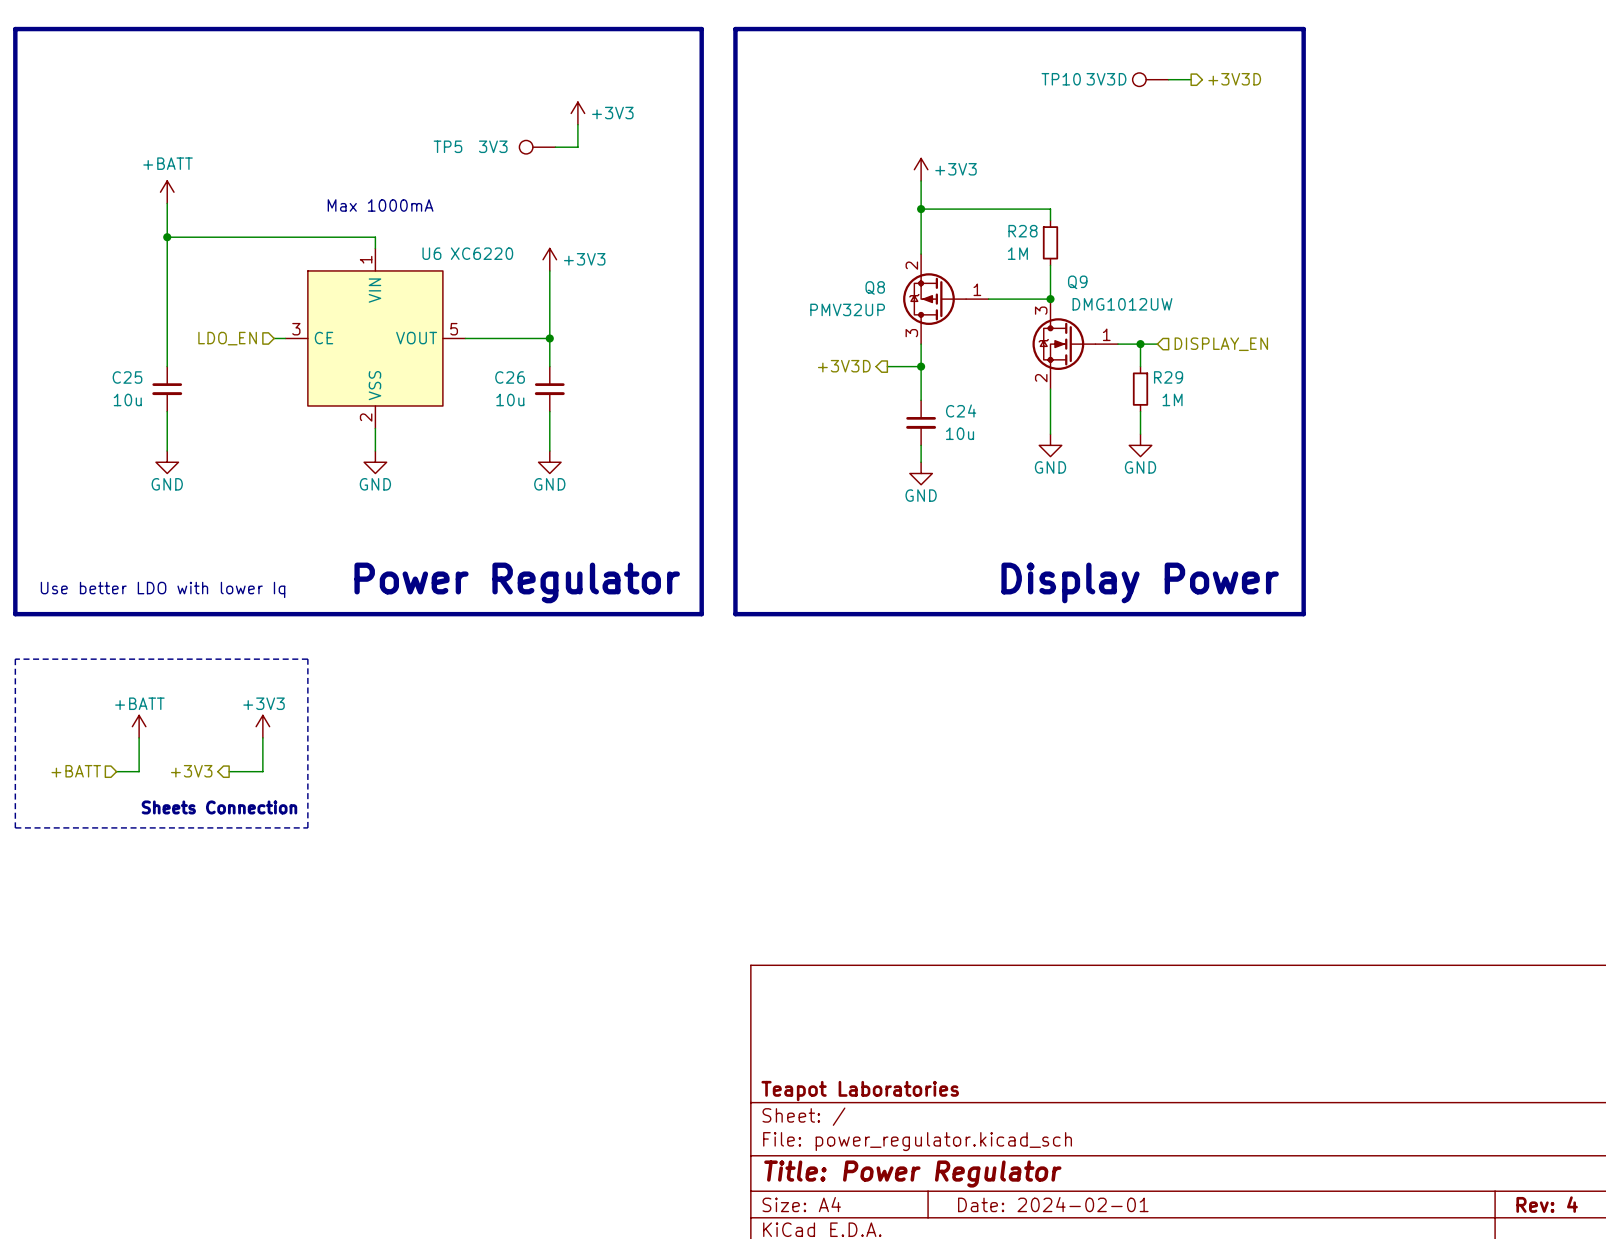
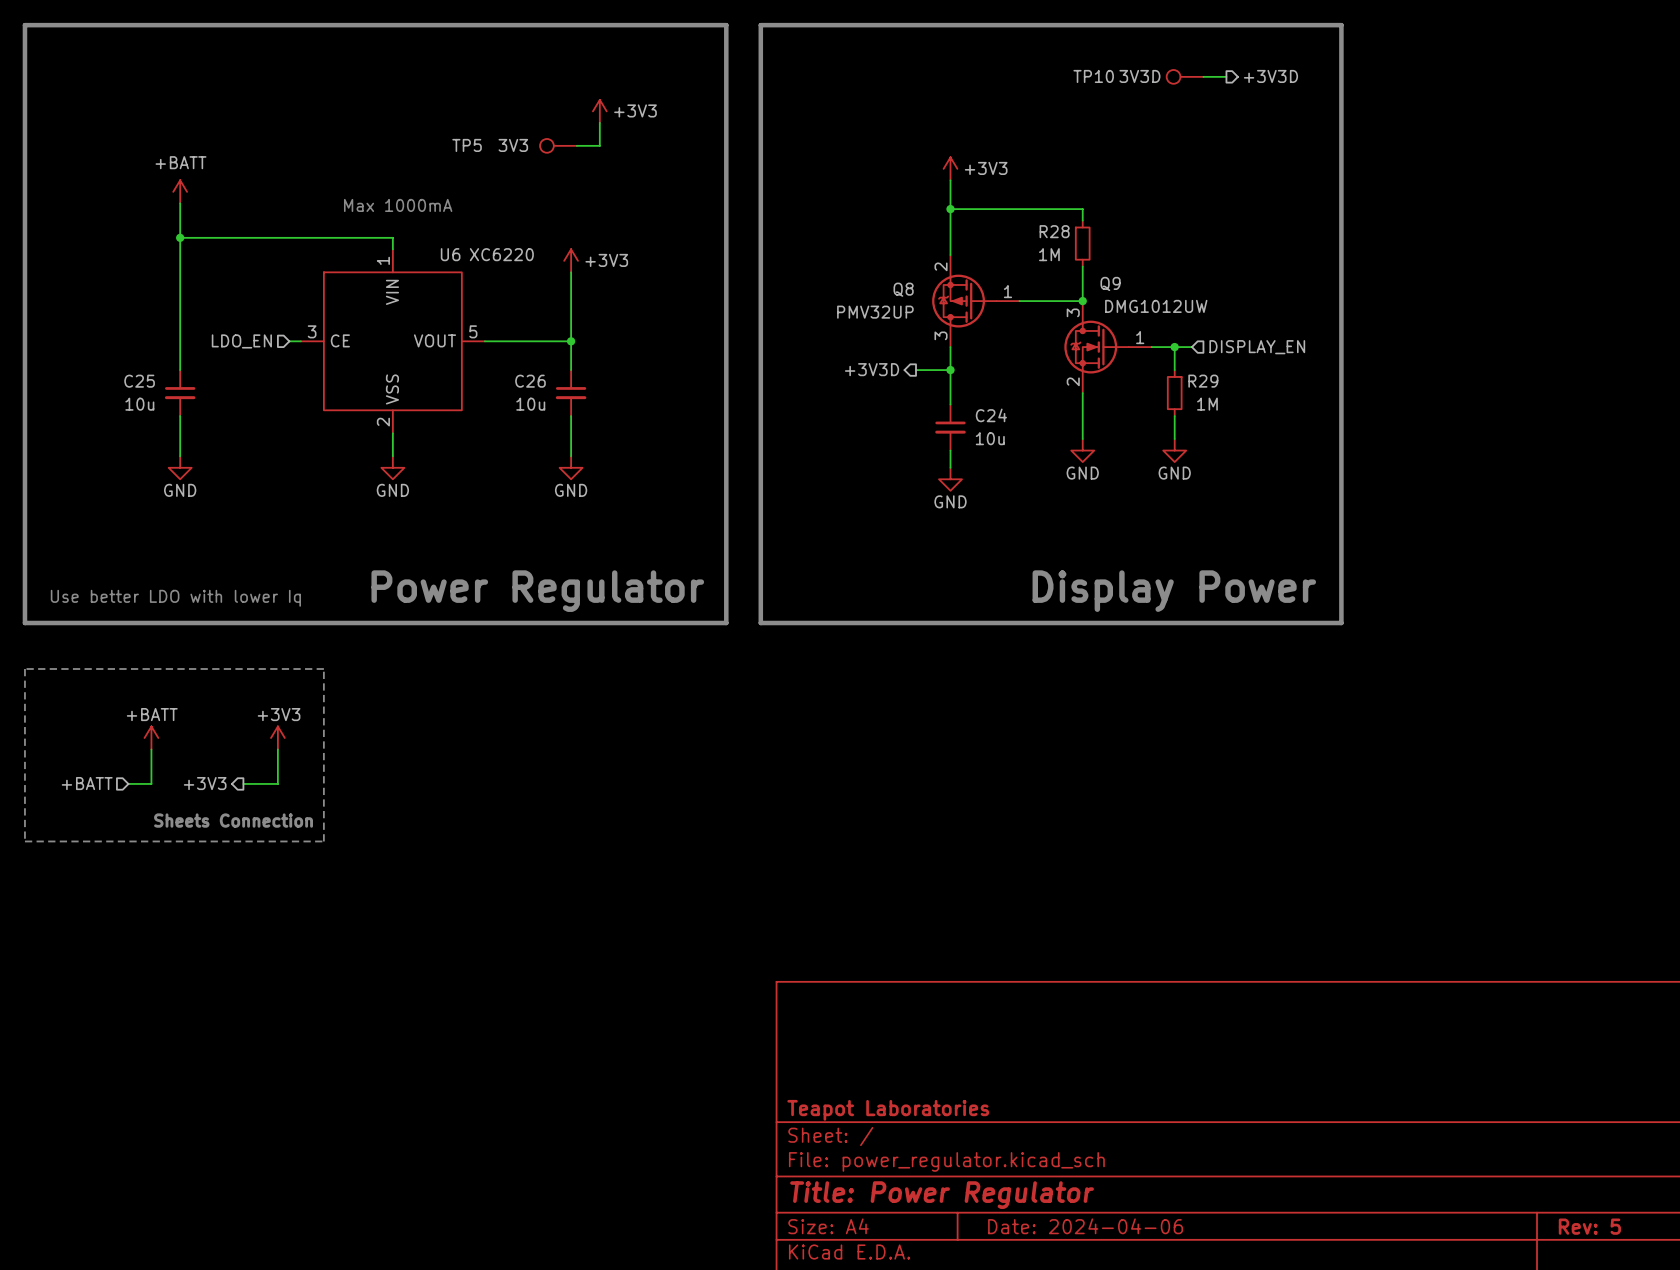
title block: Date: 2024-02-01 (1053, 1204) -> Date: 2024-04-06 (1085, 1226)
title block: Rev: 4 (1547, 1204) -> Rev: 5 (1589, 1226)

